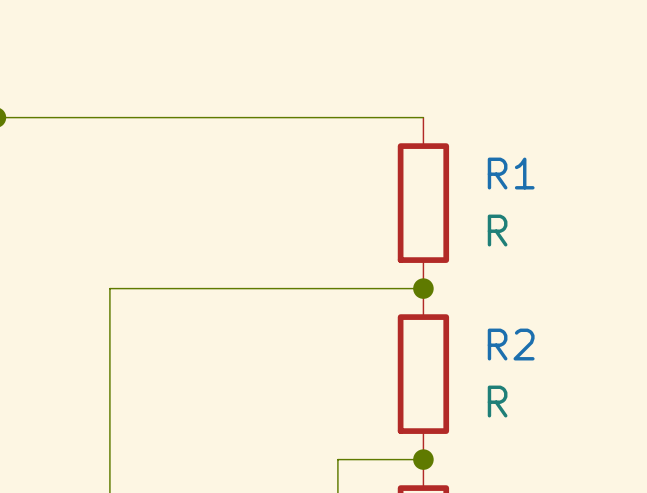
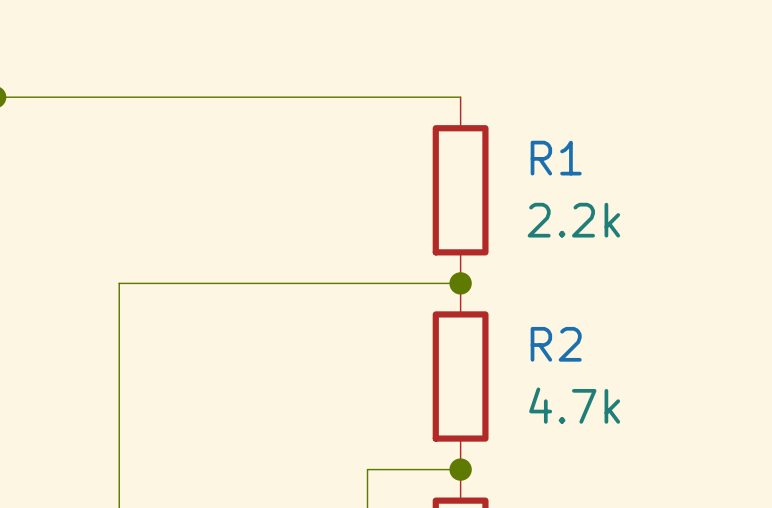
R1 value: R (497, 230) -> 2.2k (573, 220)
R2 value: R (497, 401) -> 4.7k (574, 405)

